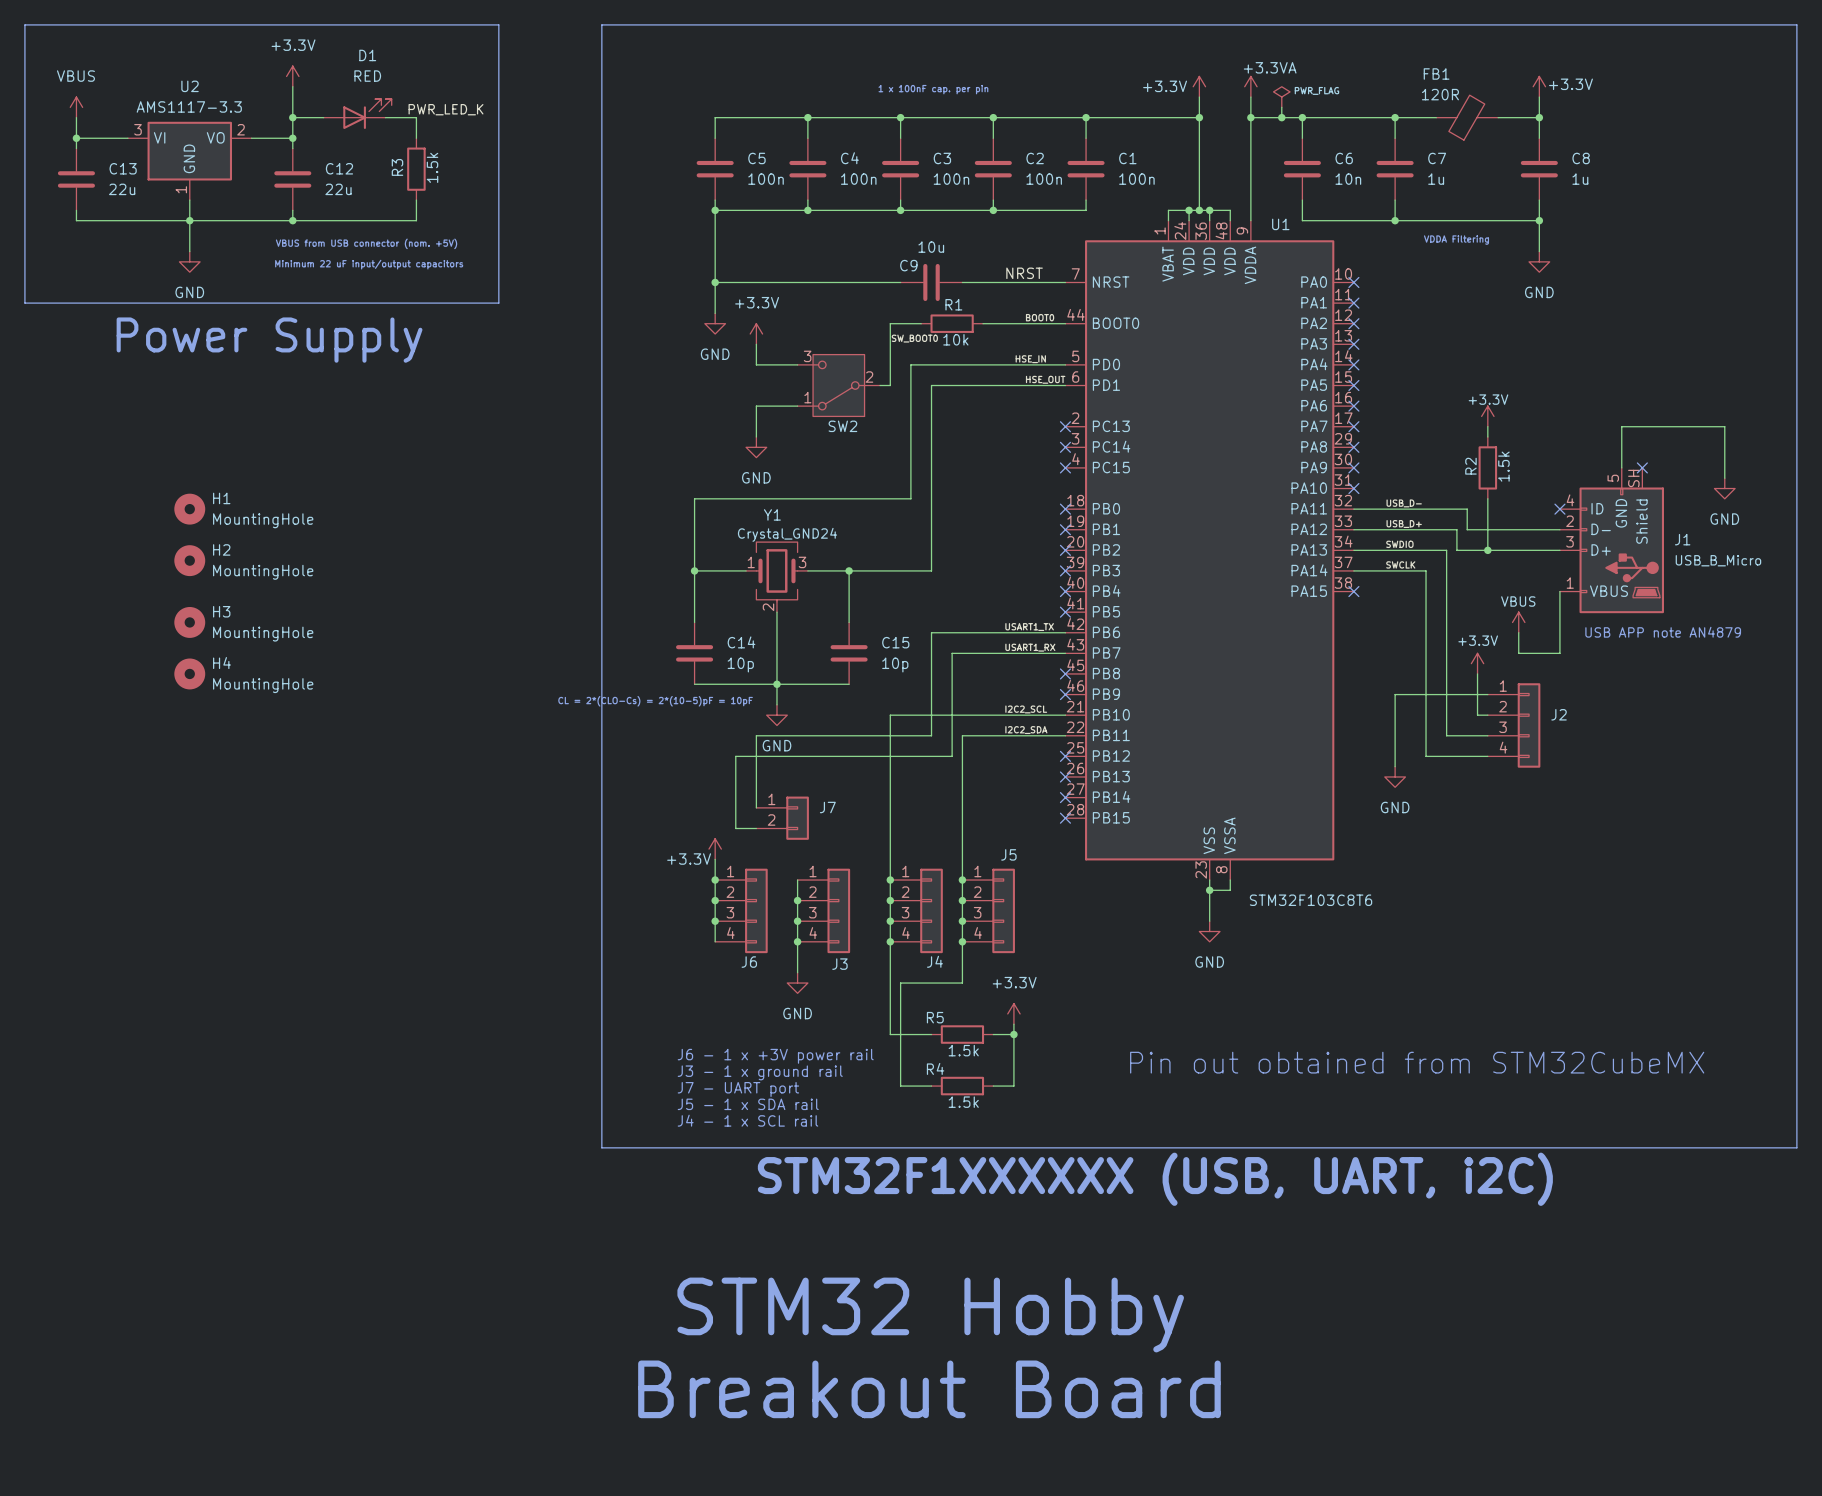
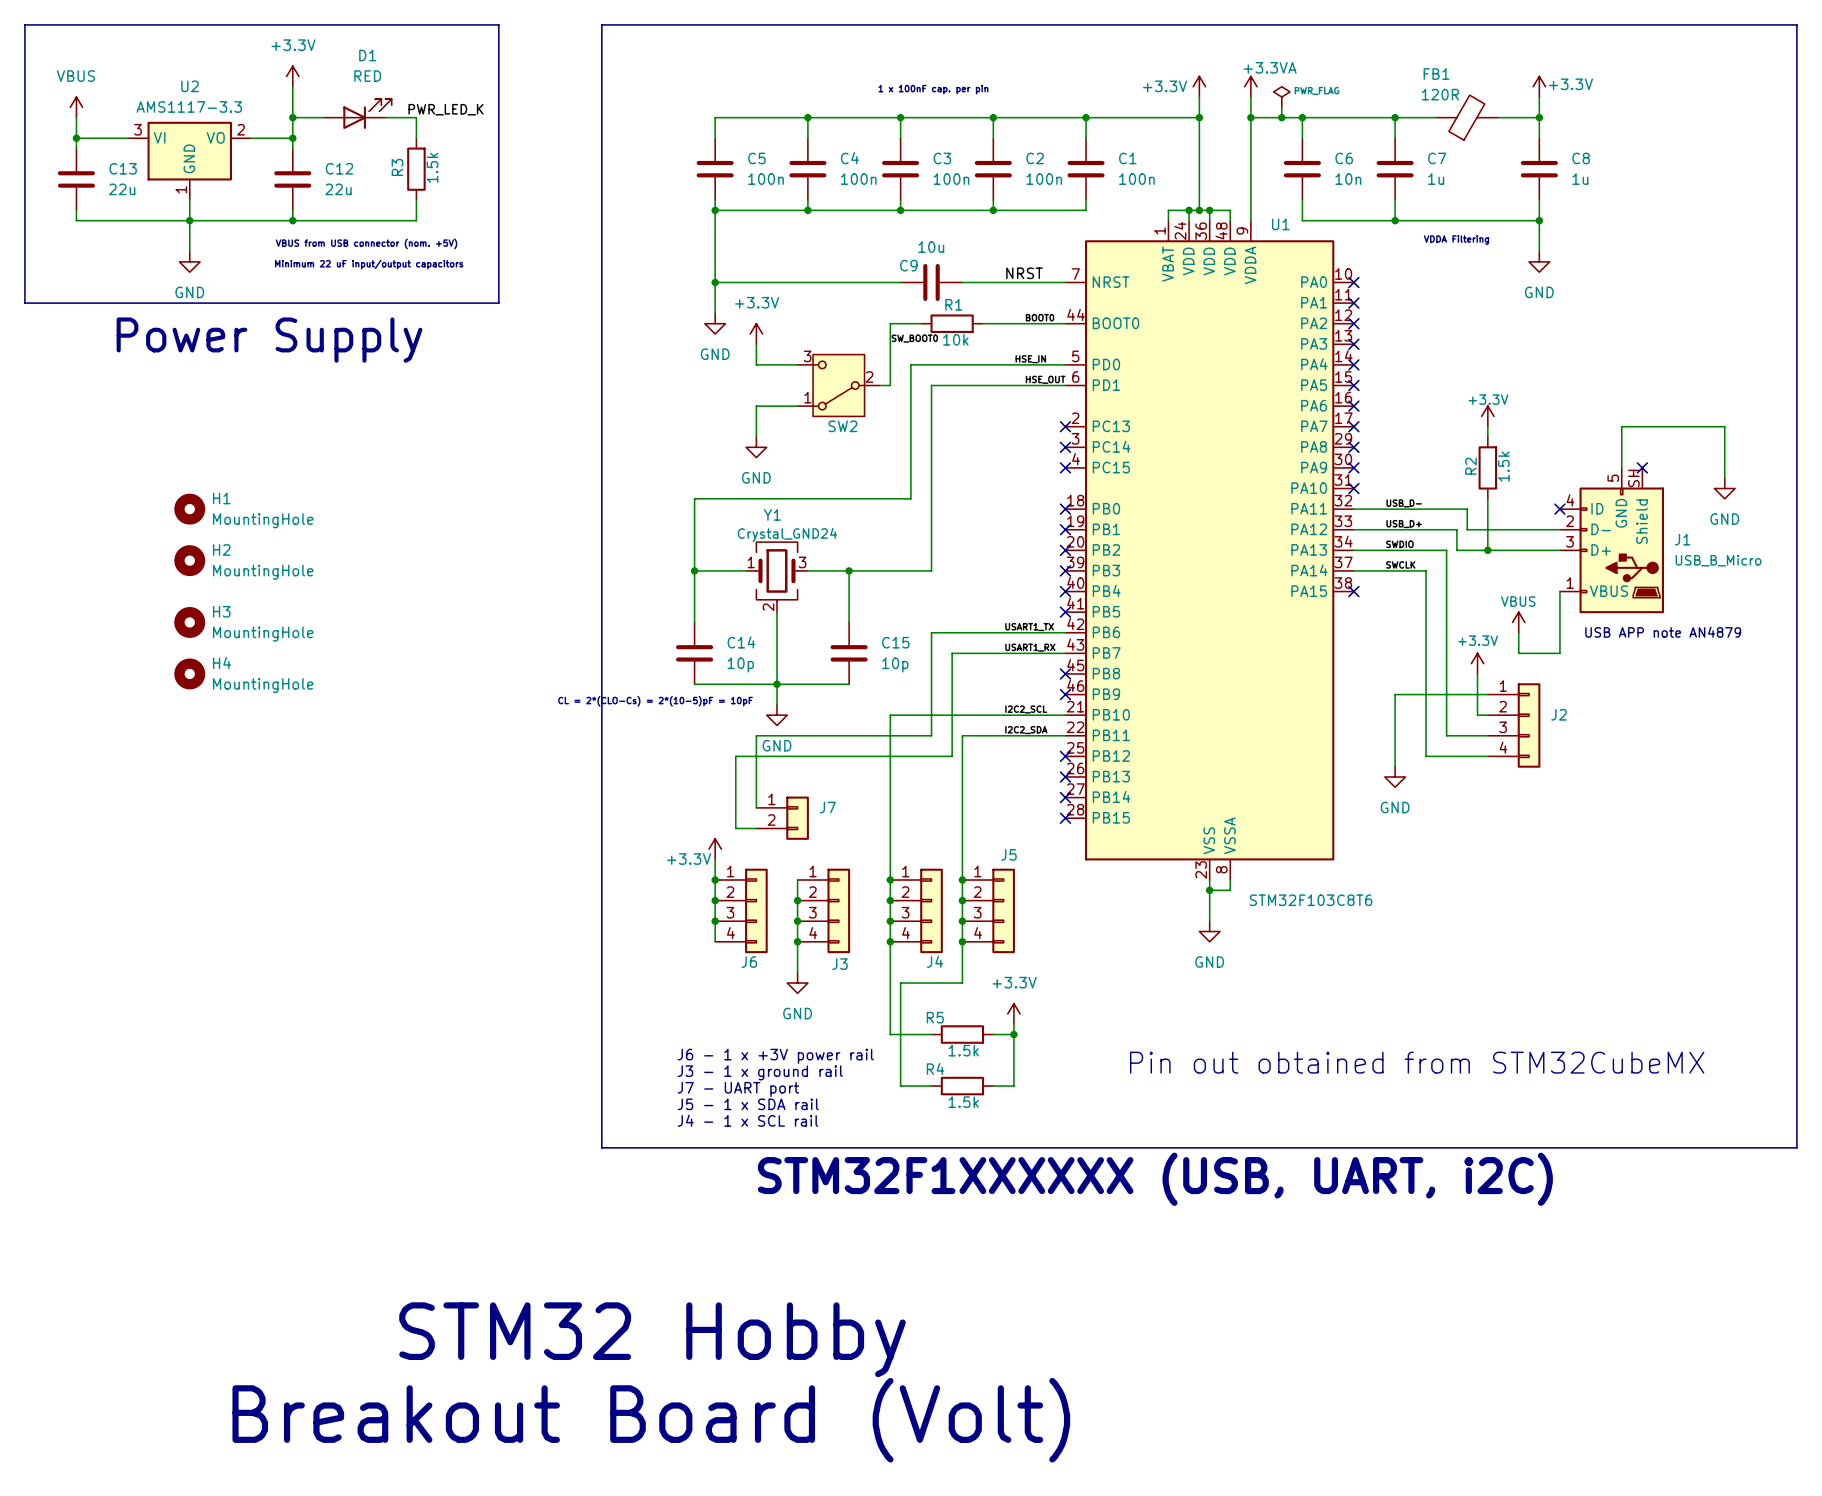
text: STM32 Hobby (930, 1315) -> none
text: none -> STM32 Hobby (652, 1339)
text: Breakout Board (929, 1389) -> none
text: none -> Breakout Board (Volt) (651, 1420)

